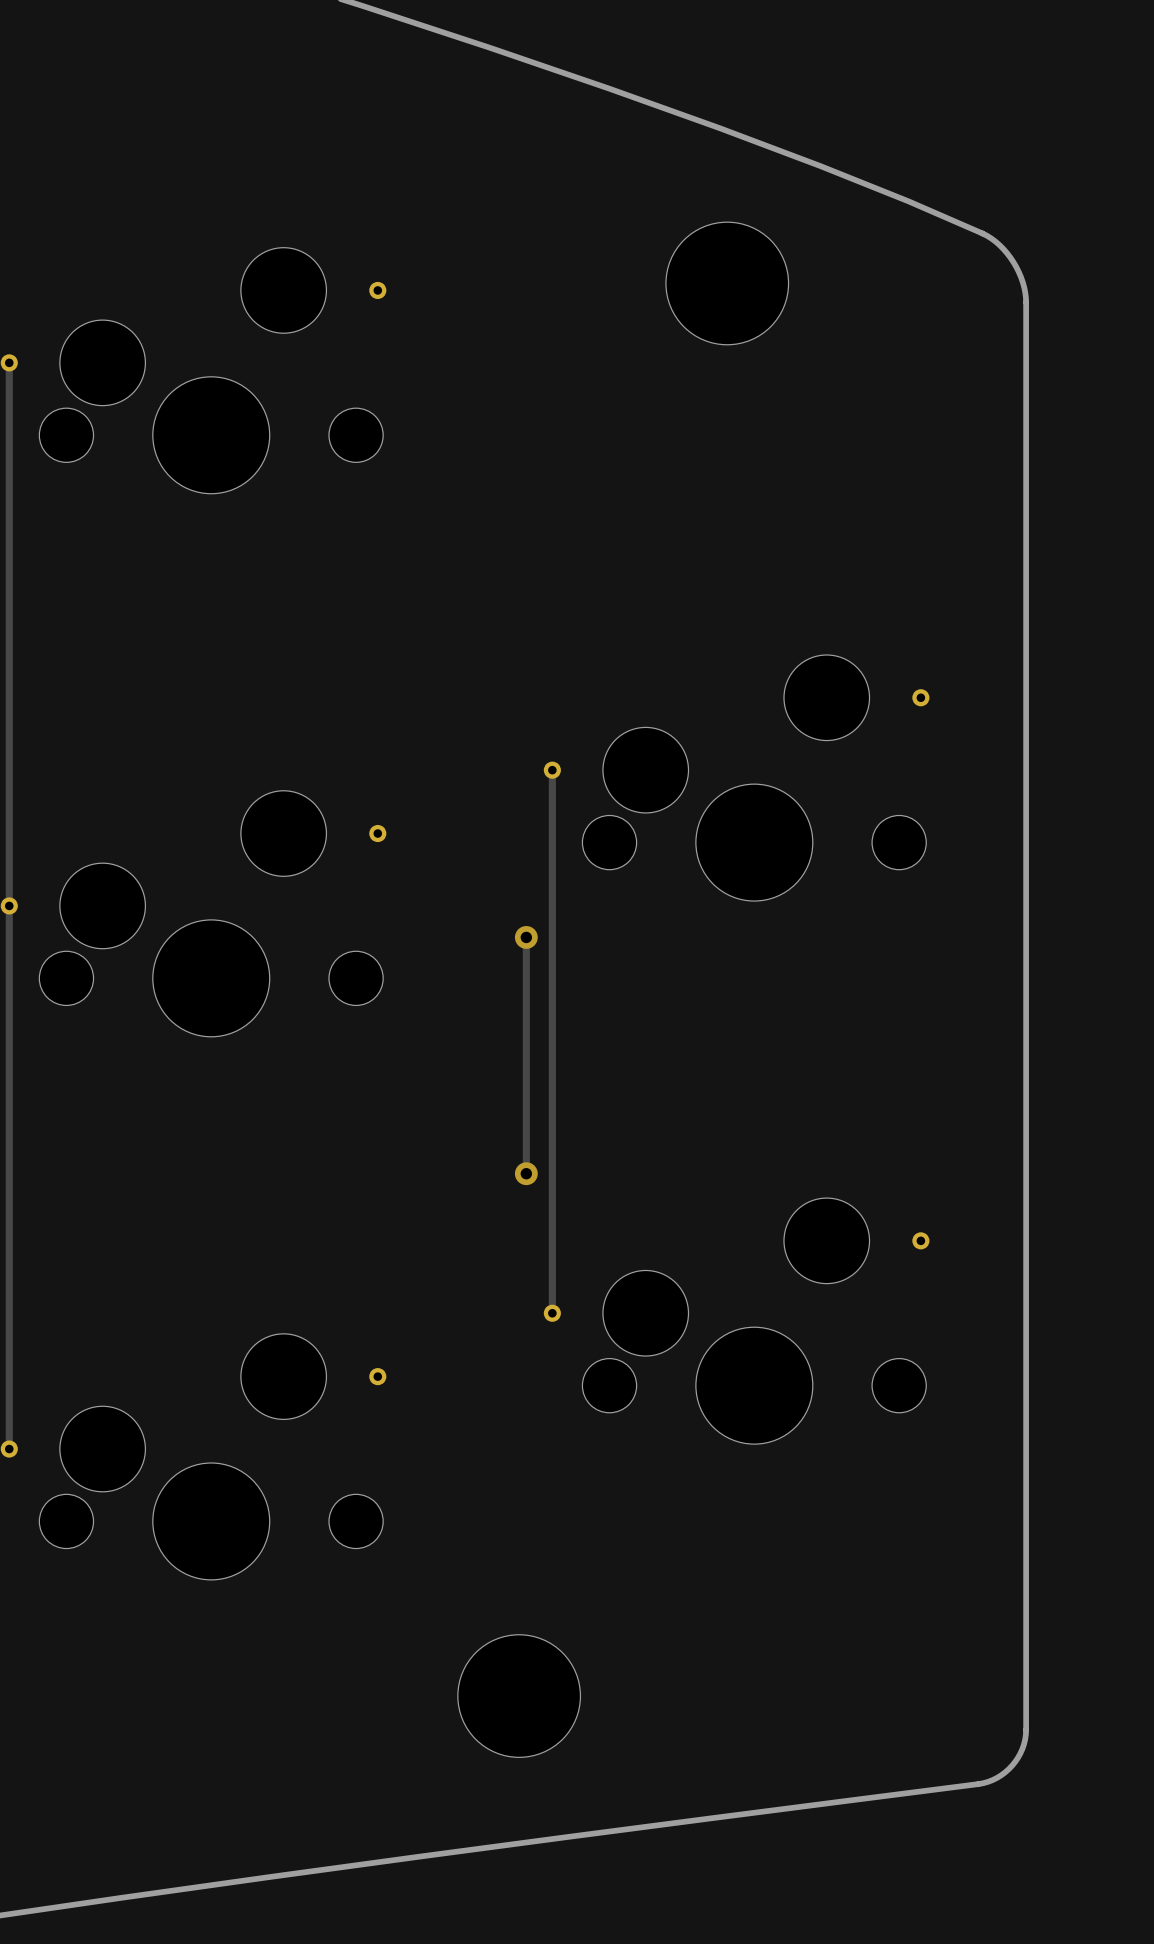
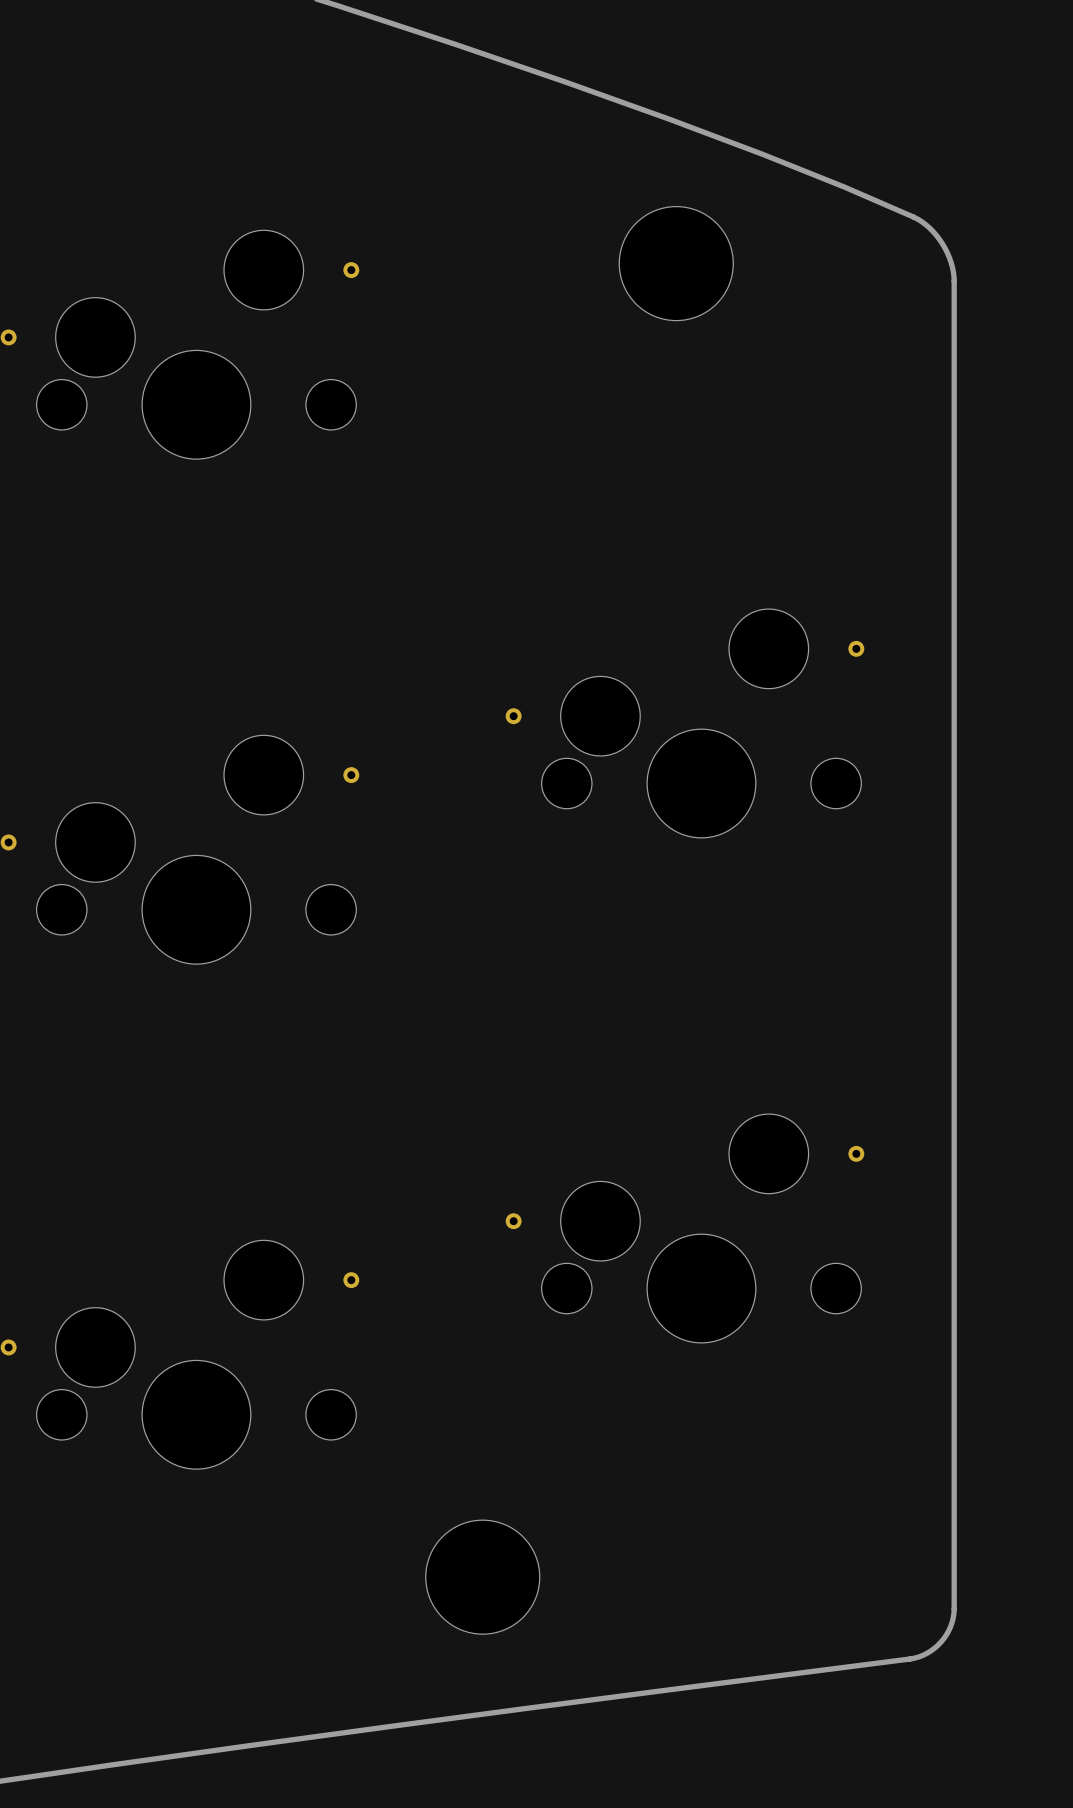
track: (9, 362) (9, 1449) -> none
track: (552, 770) (552, 1313) -> none
track: (526, 937) (526, 1173) -> none
via: (526, 937) -> none
via: (526, 1173) -> none

